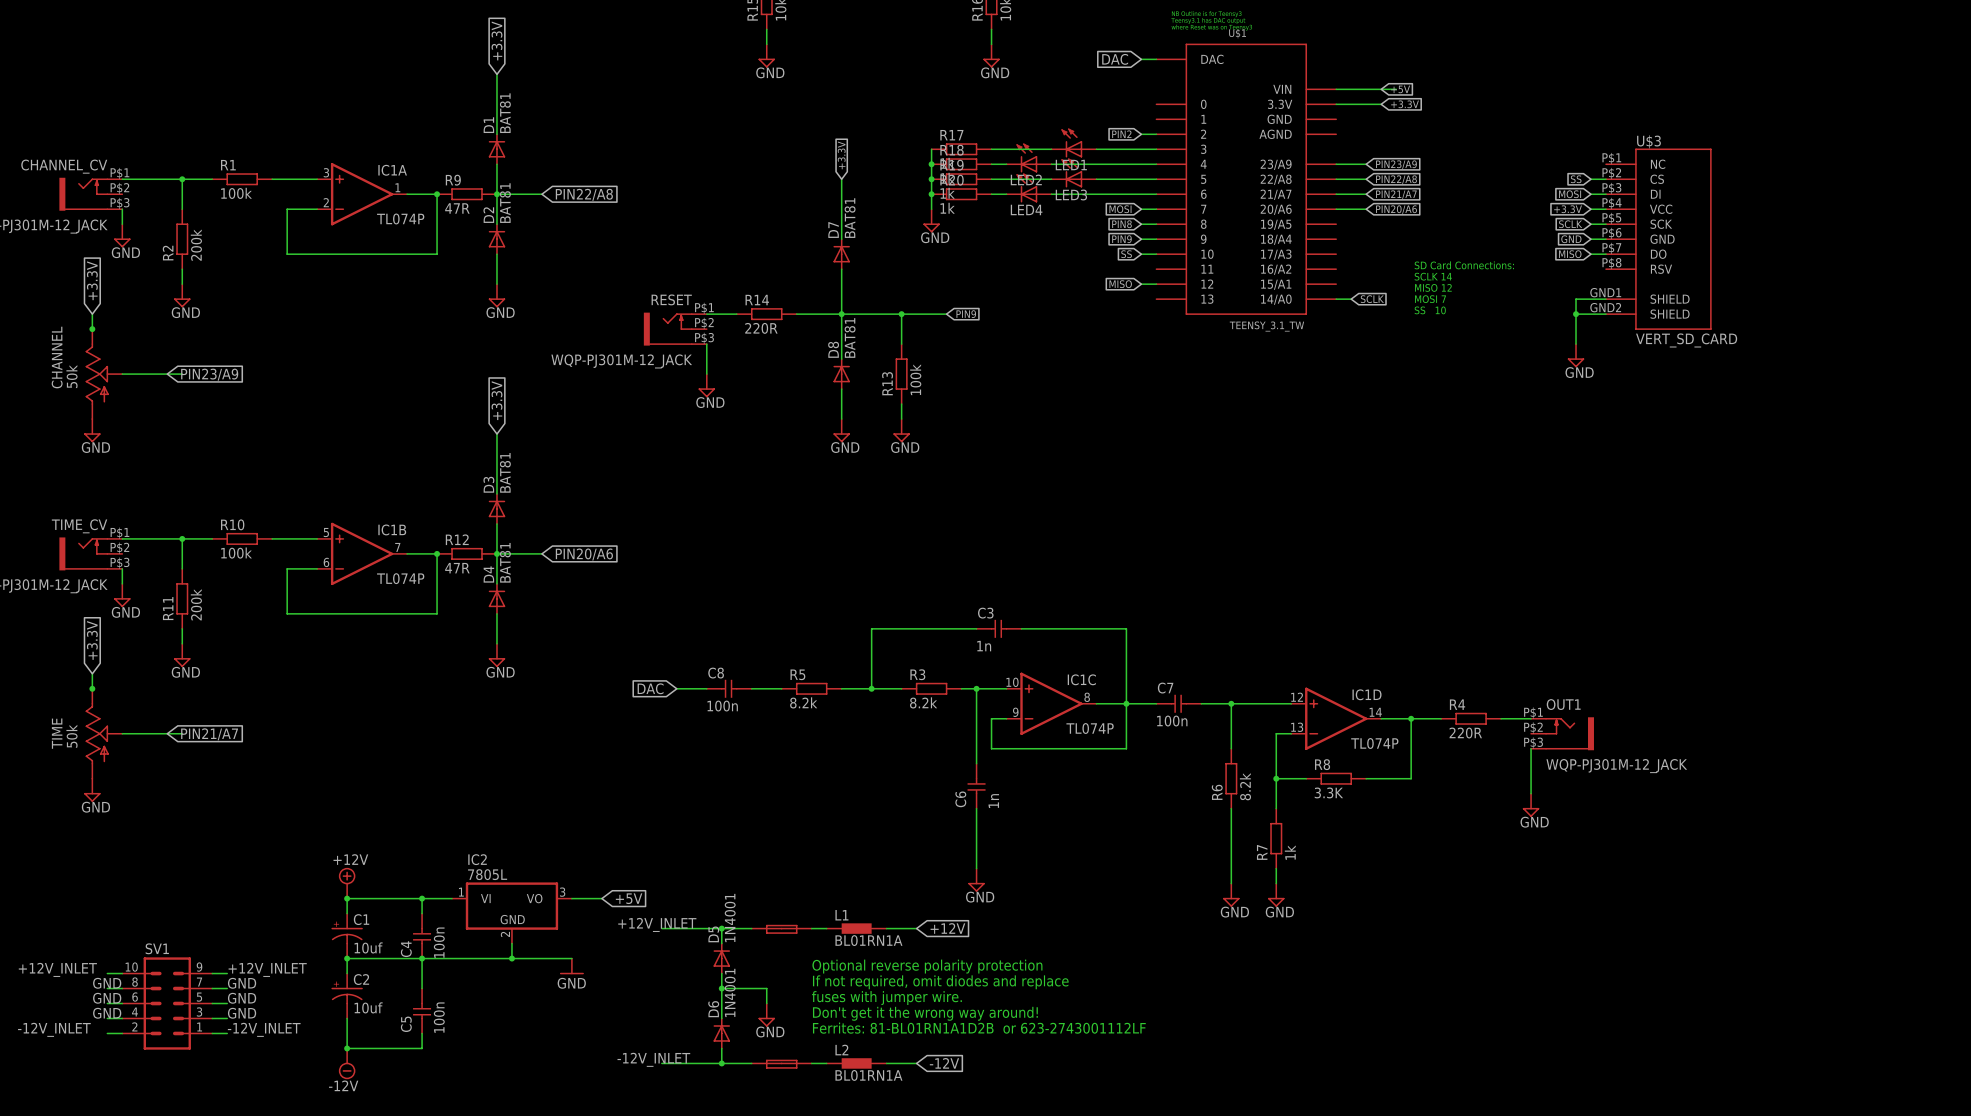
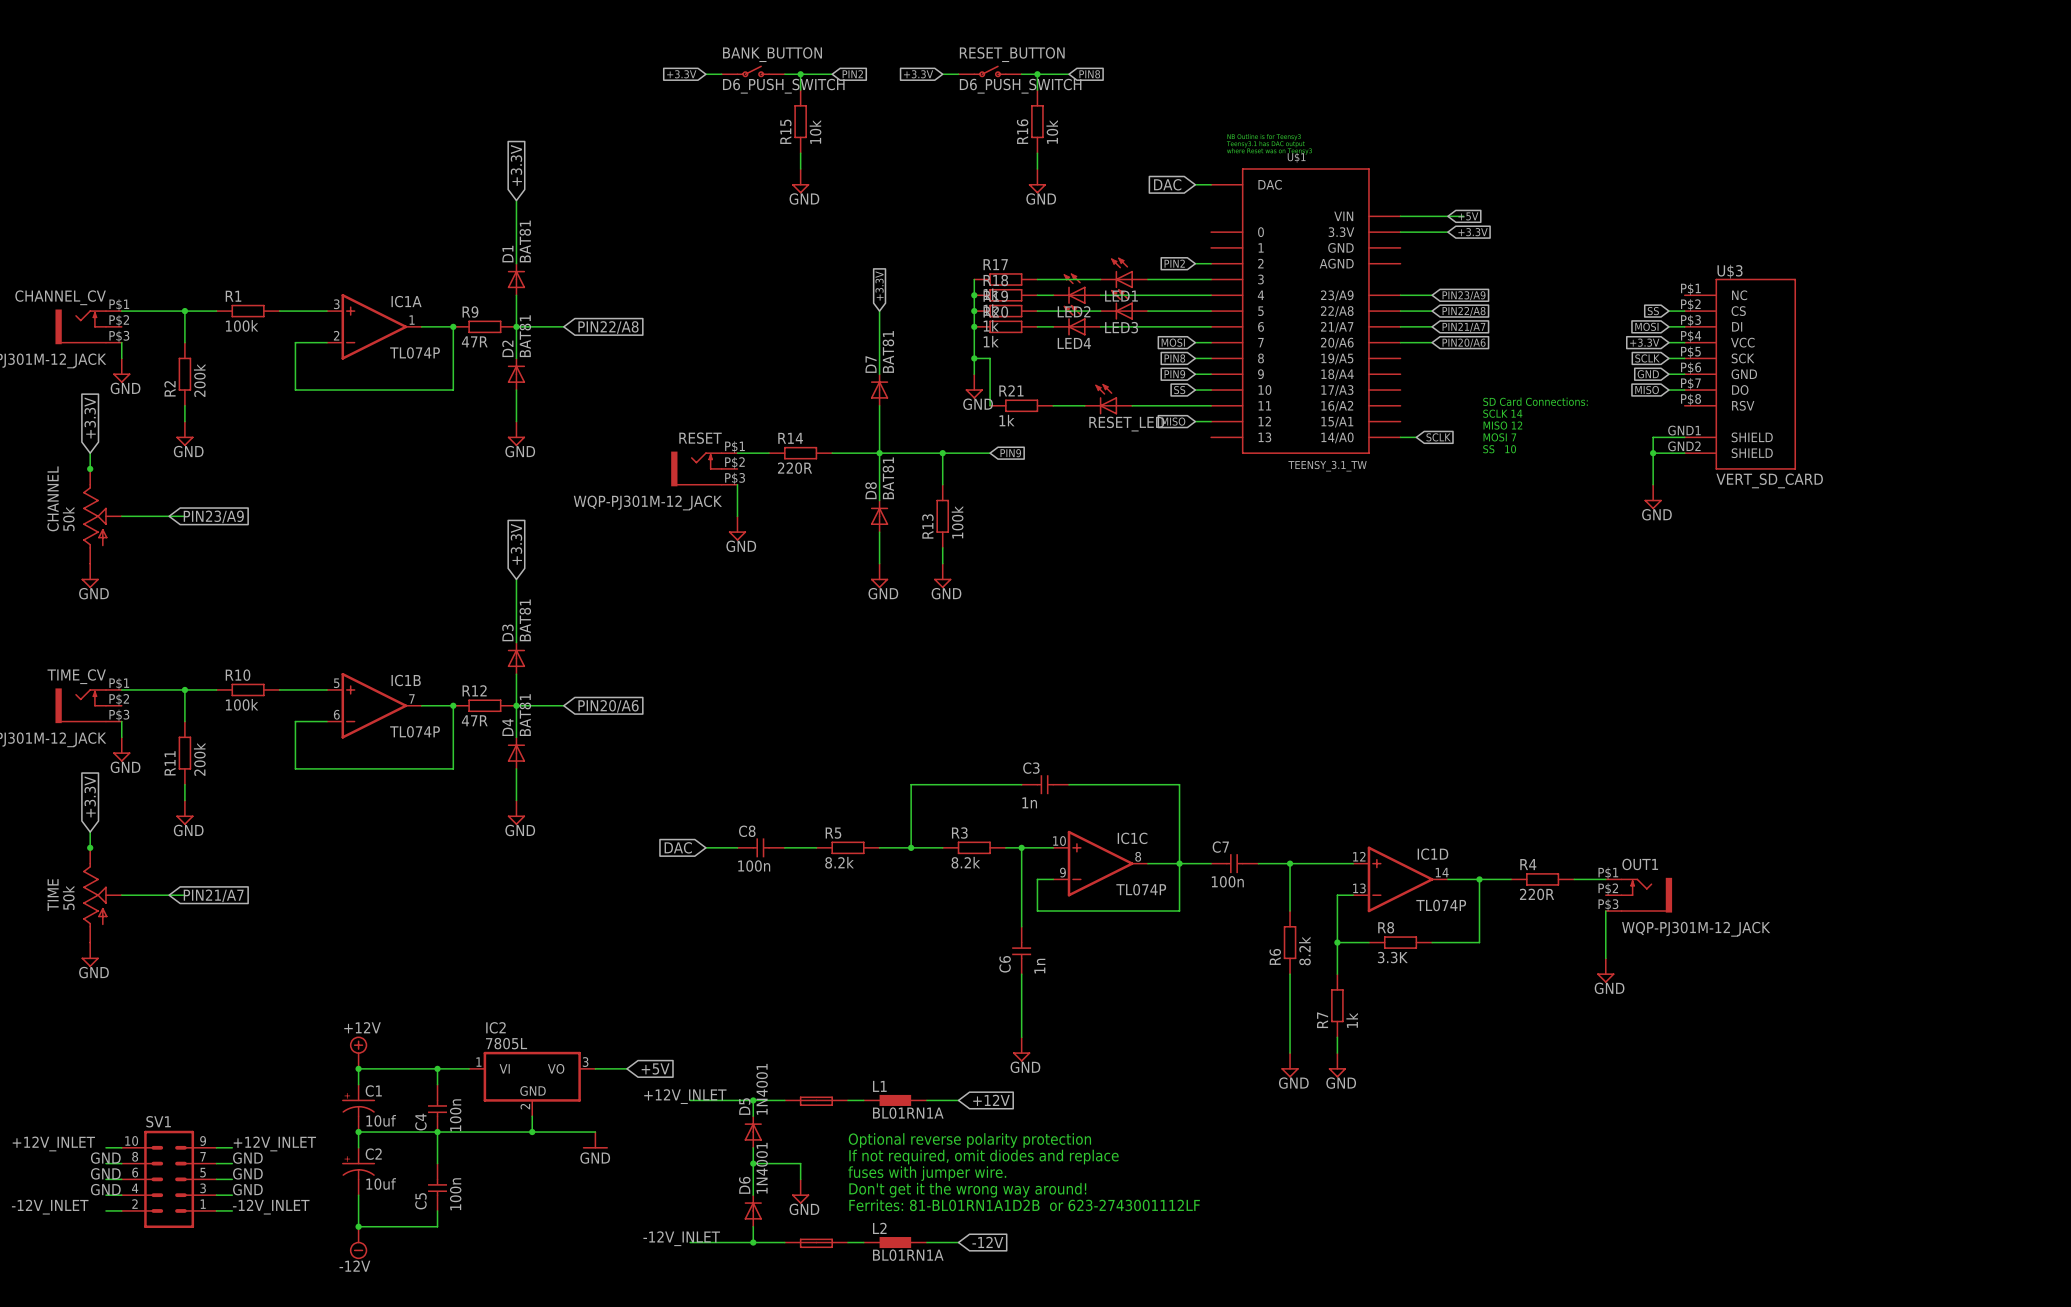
power symbol position: GND (931, 220) -> GND (974, 386)
wire: none -> (974, 358) (990, 358) (990, 405)
junction: none -> (974, 358)
RESET_LED: none -> (1108, 399)
R21: none -> 1k (1021, 405)
wire: none -> (1053, 405) (1084, 405)
wire: none -> (1132, 405) (1211, 405)

